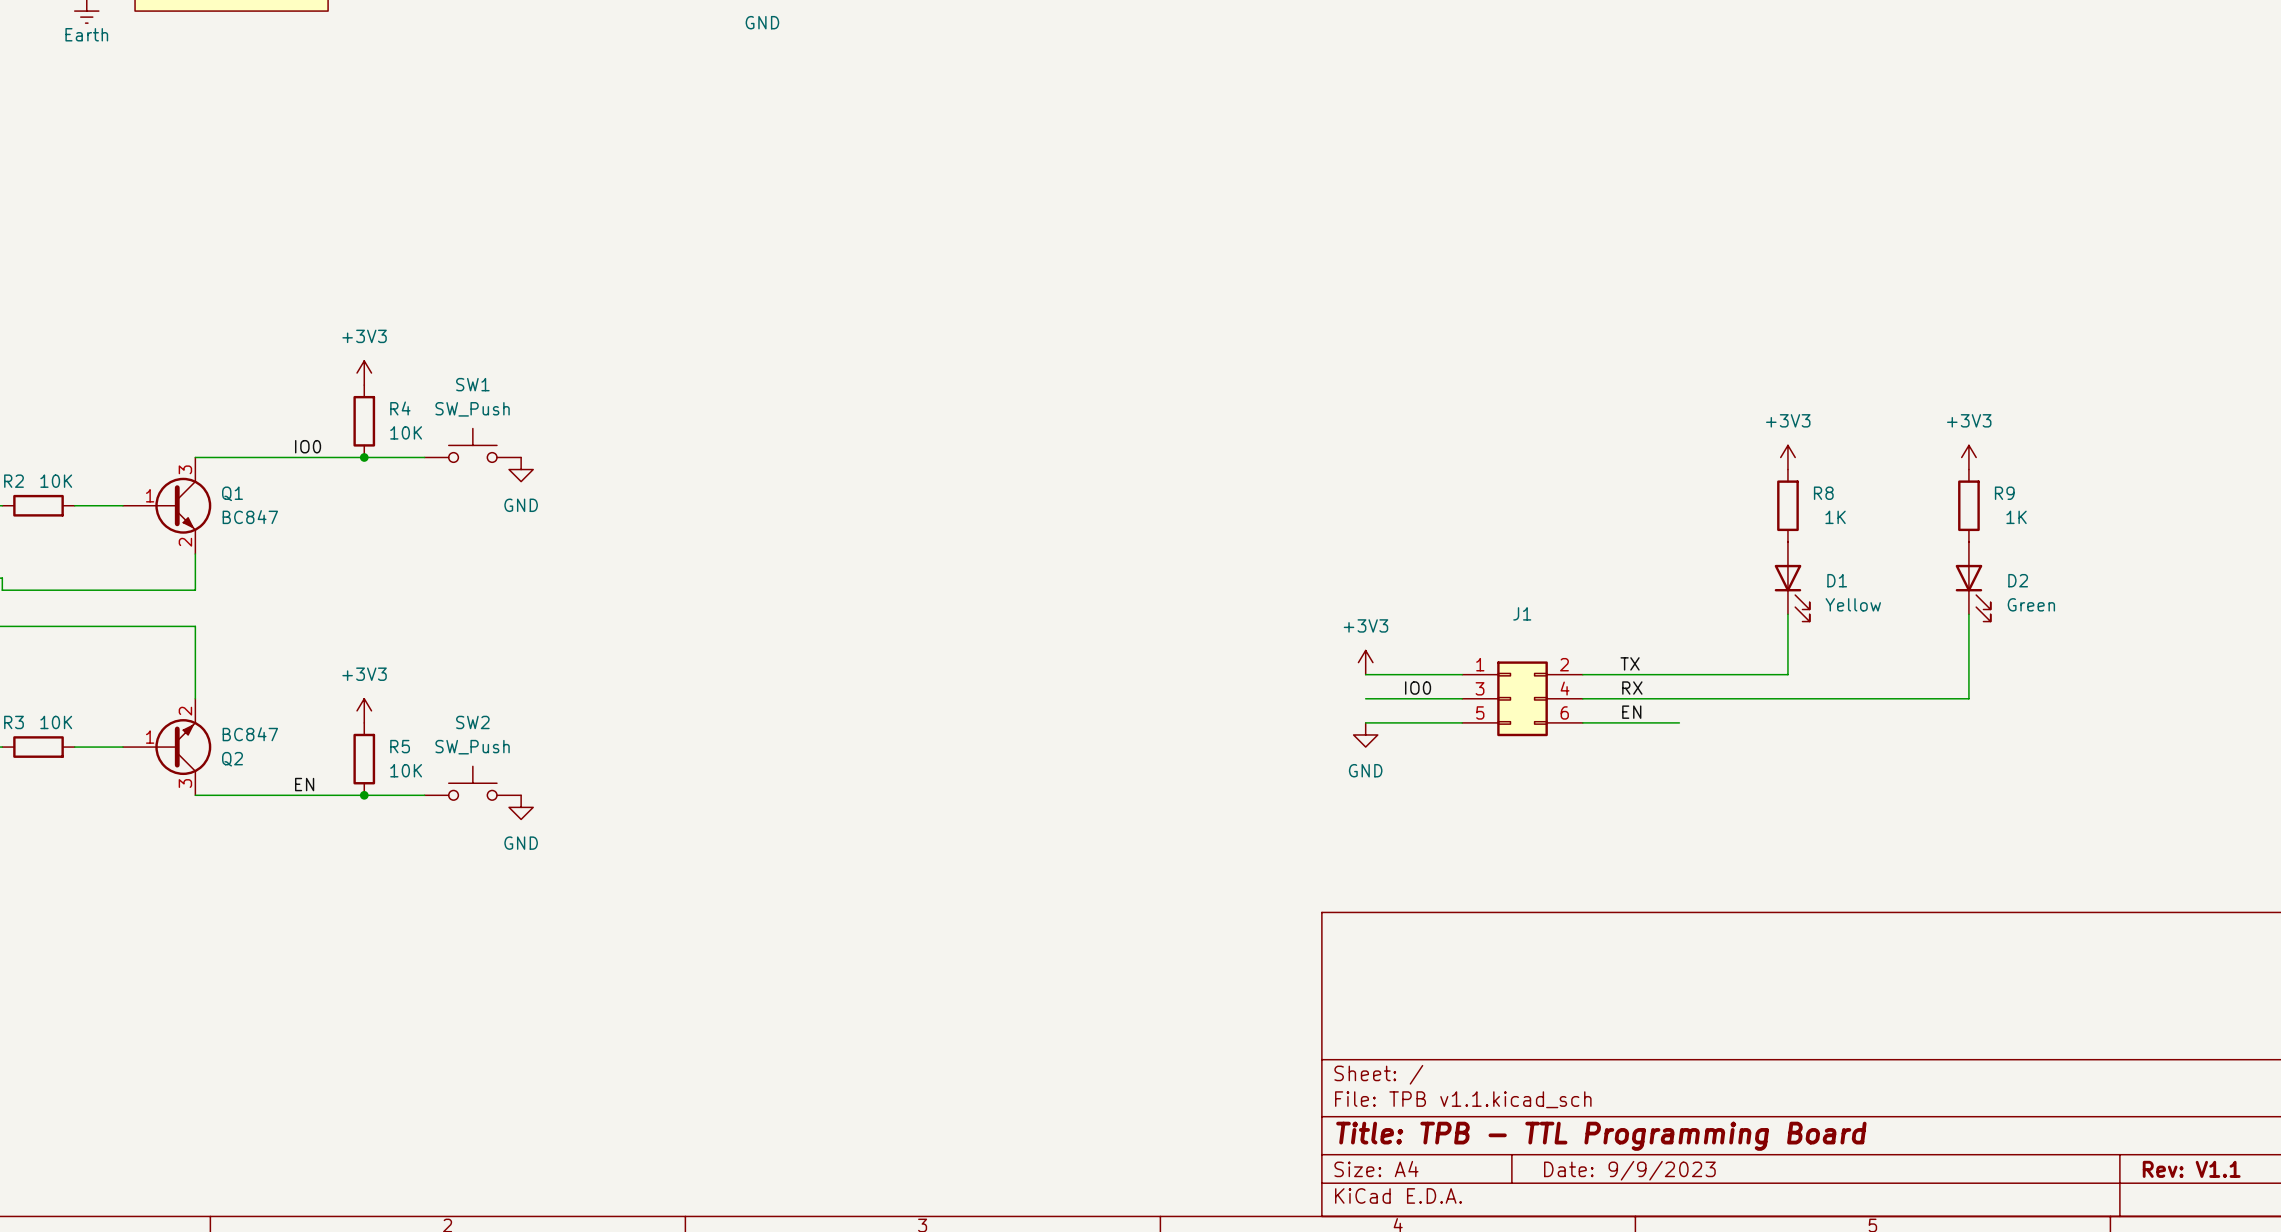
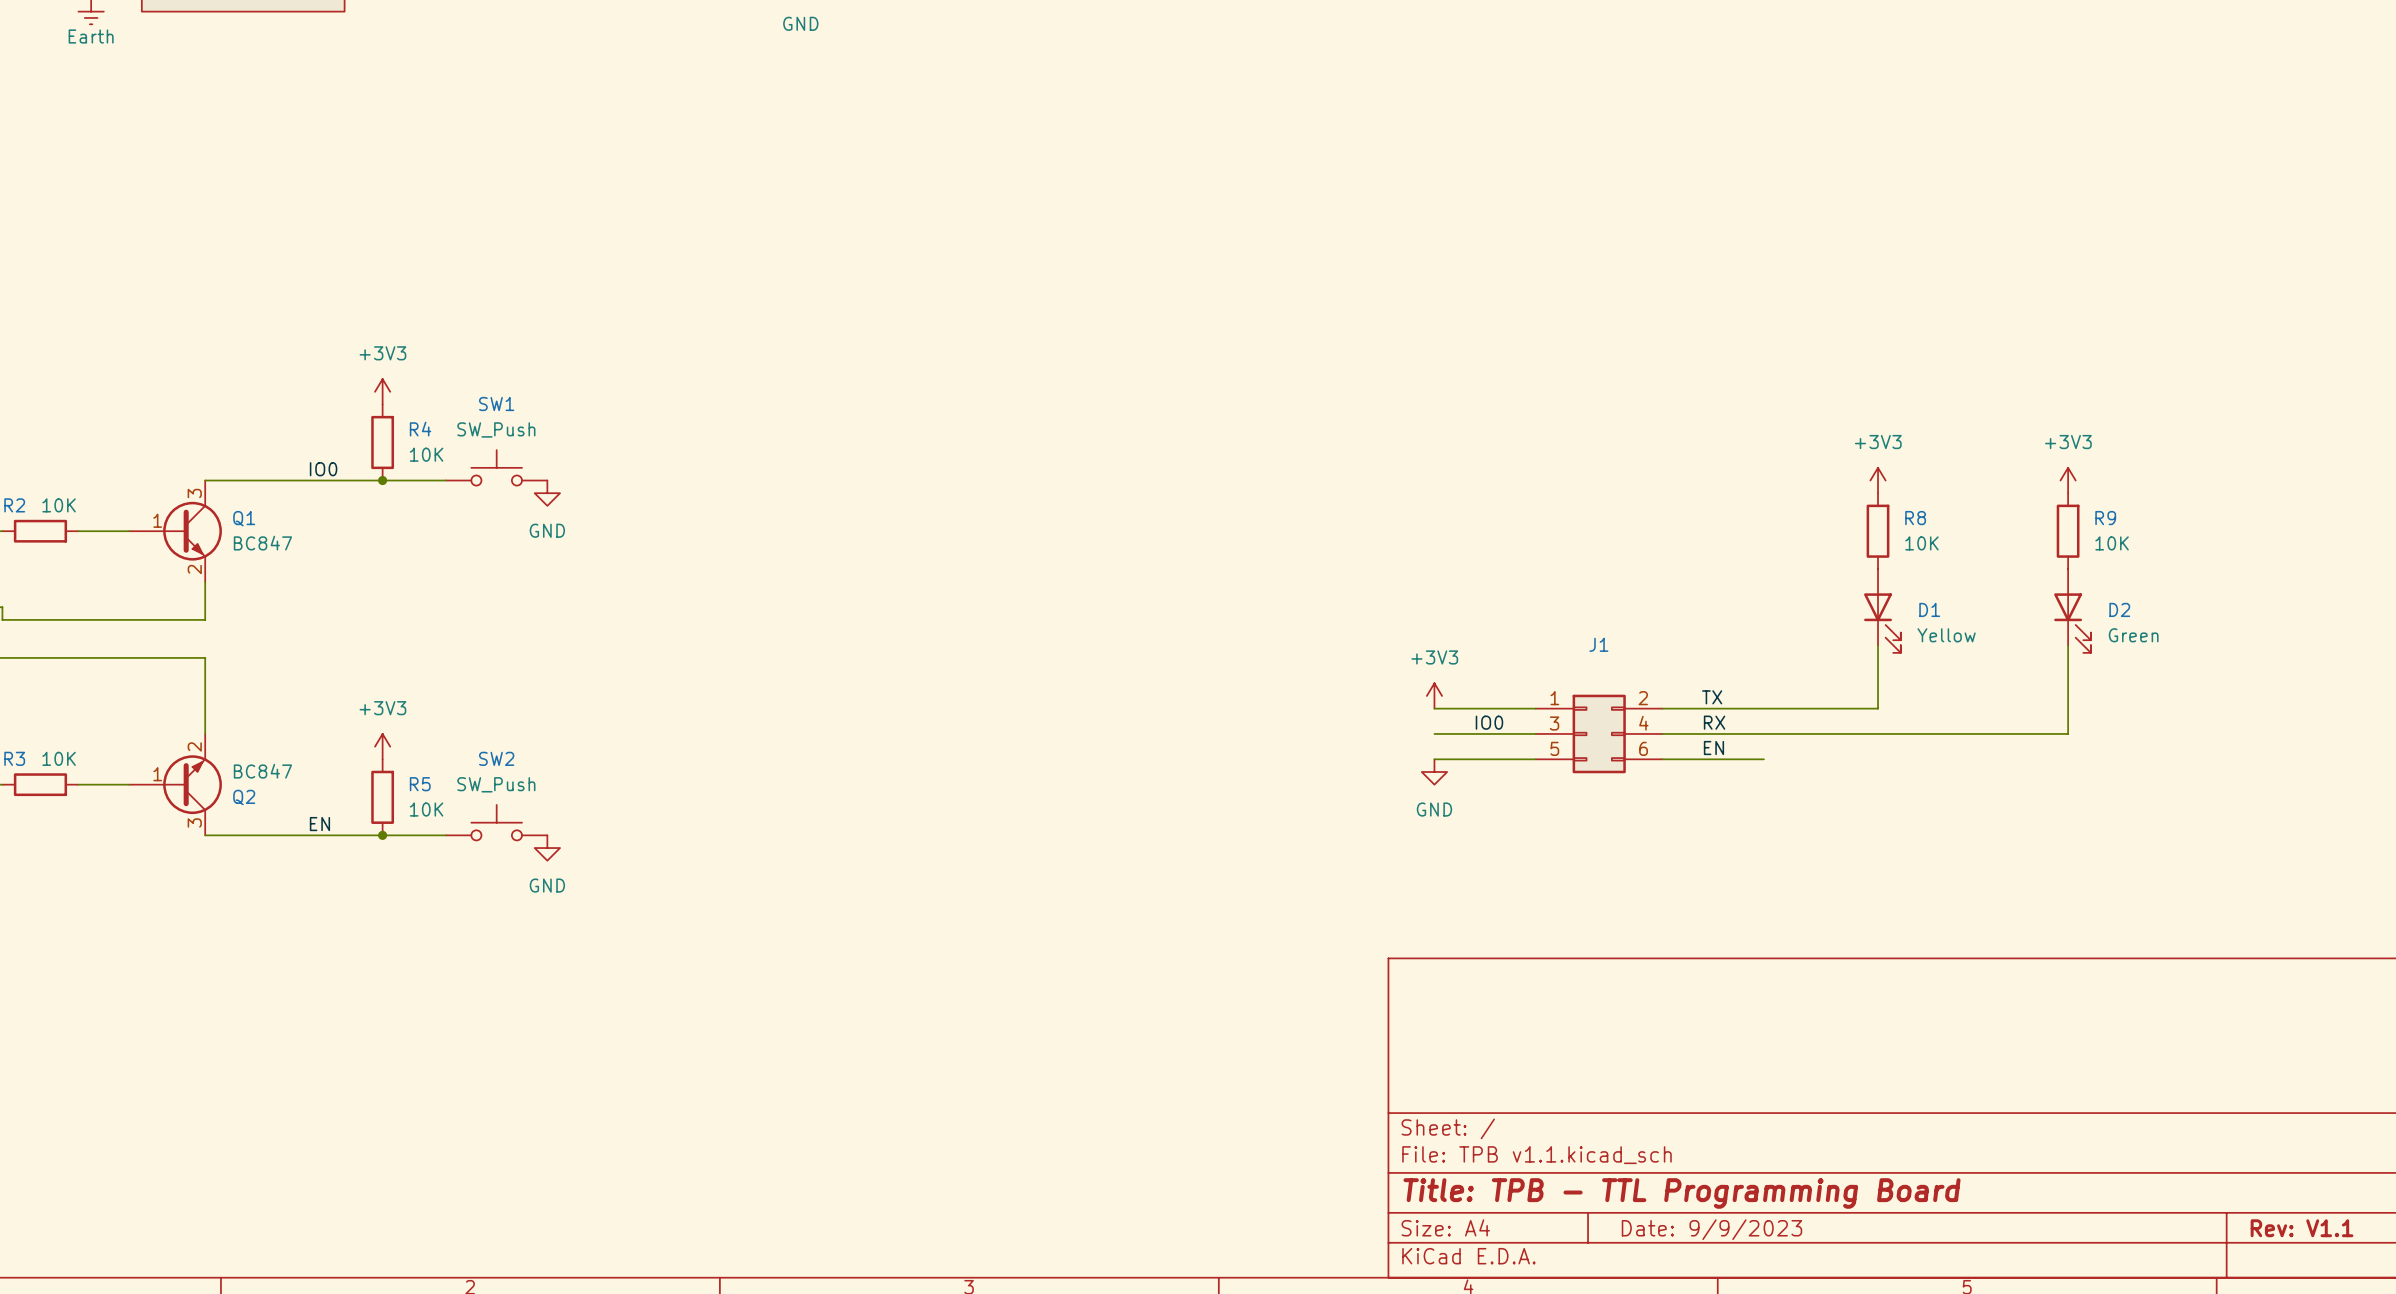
R8 value: 1K (1835, 517) -> 10K (1921, 543)
R9 value: 1K (2016, 517) -> 10K (2112, 543)

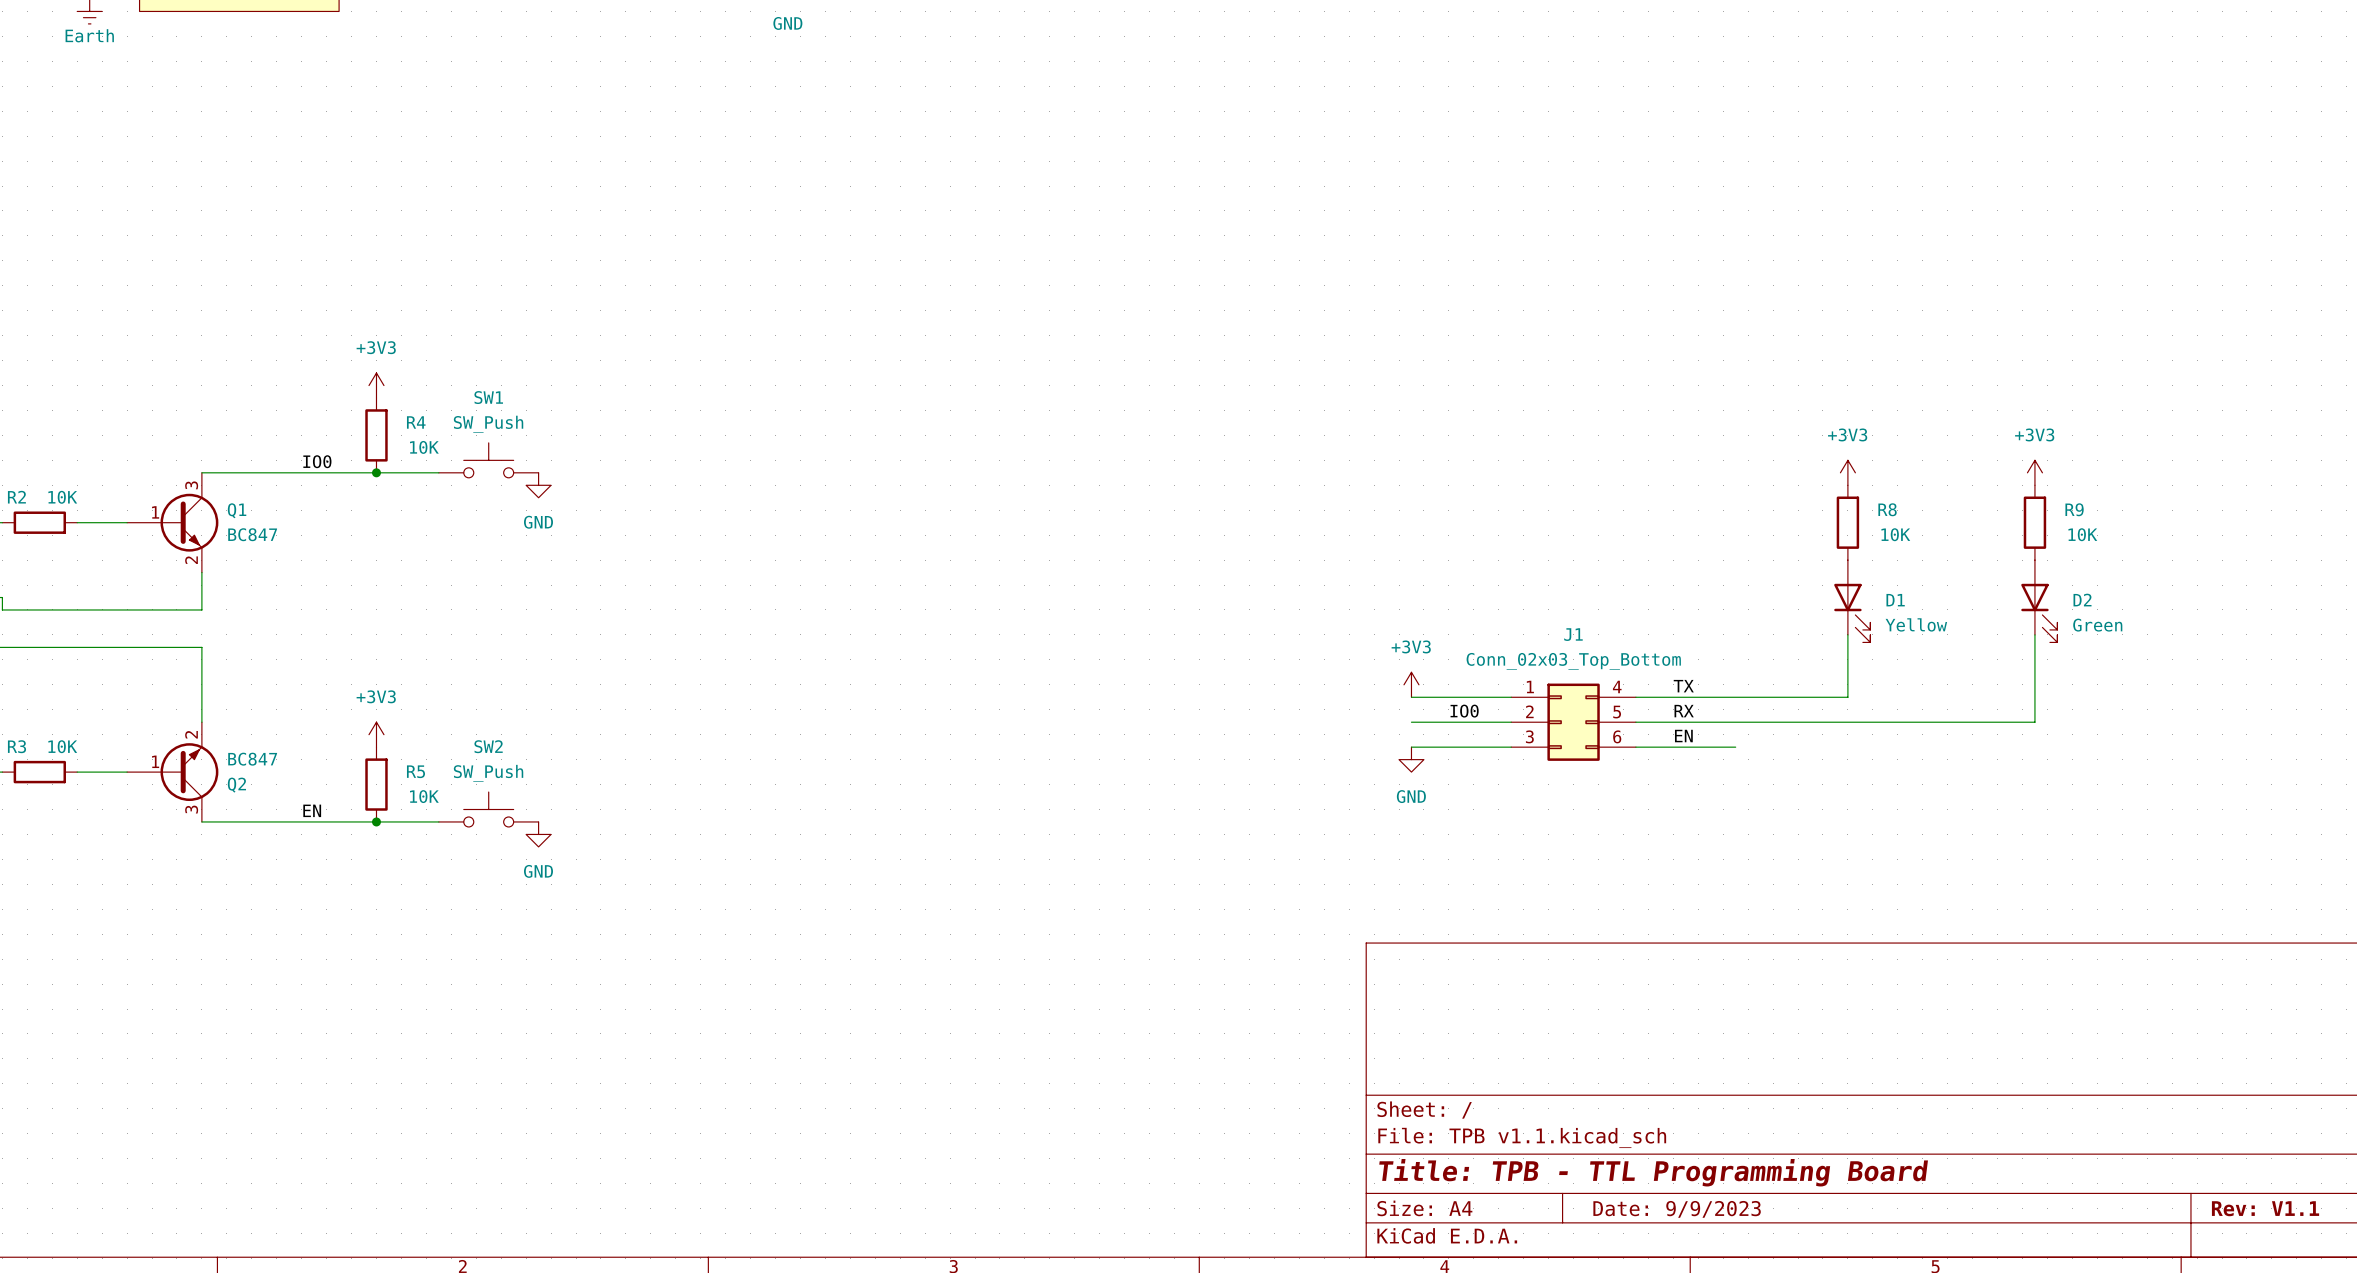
J1 value: none -> Conn_02x03_Top_Bottom (1573, 661)
J1 pin number: 2 (1643, 698) -> 4 (1617, 686)
J1 pin number: 3 (1554, 723) -> 2 (1529, 711)
J1 pin number: 4 (1643, 723) -> 5 (1617, 712)
J1 pin number: 5 (1554, 748) -> 3 (1529, 736)

